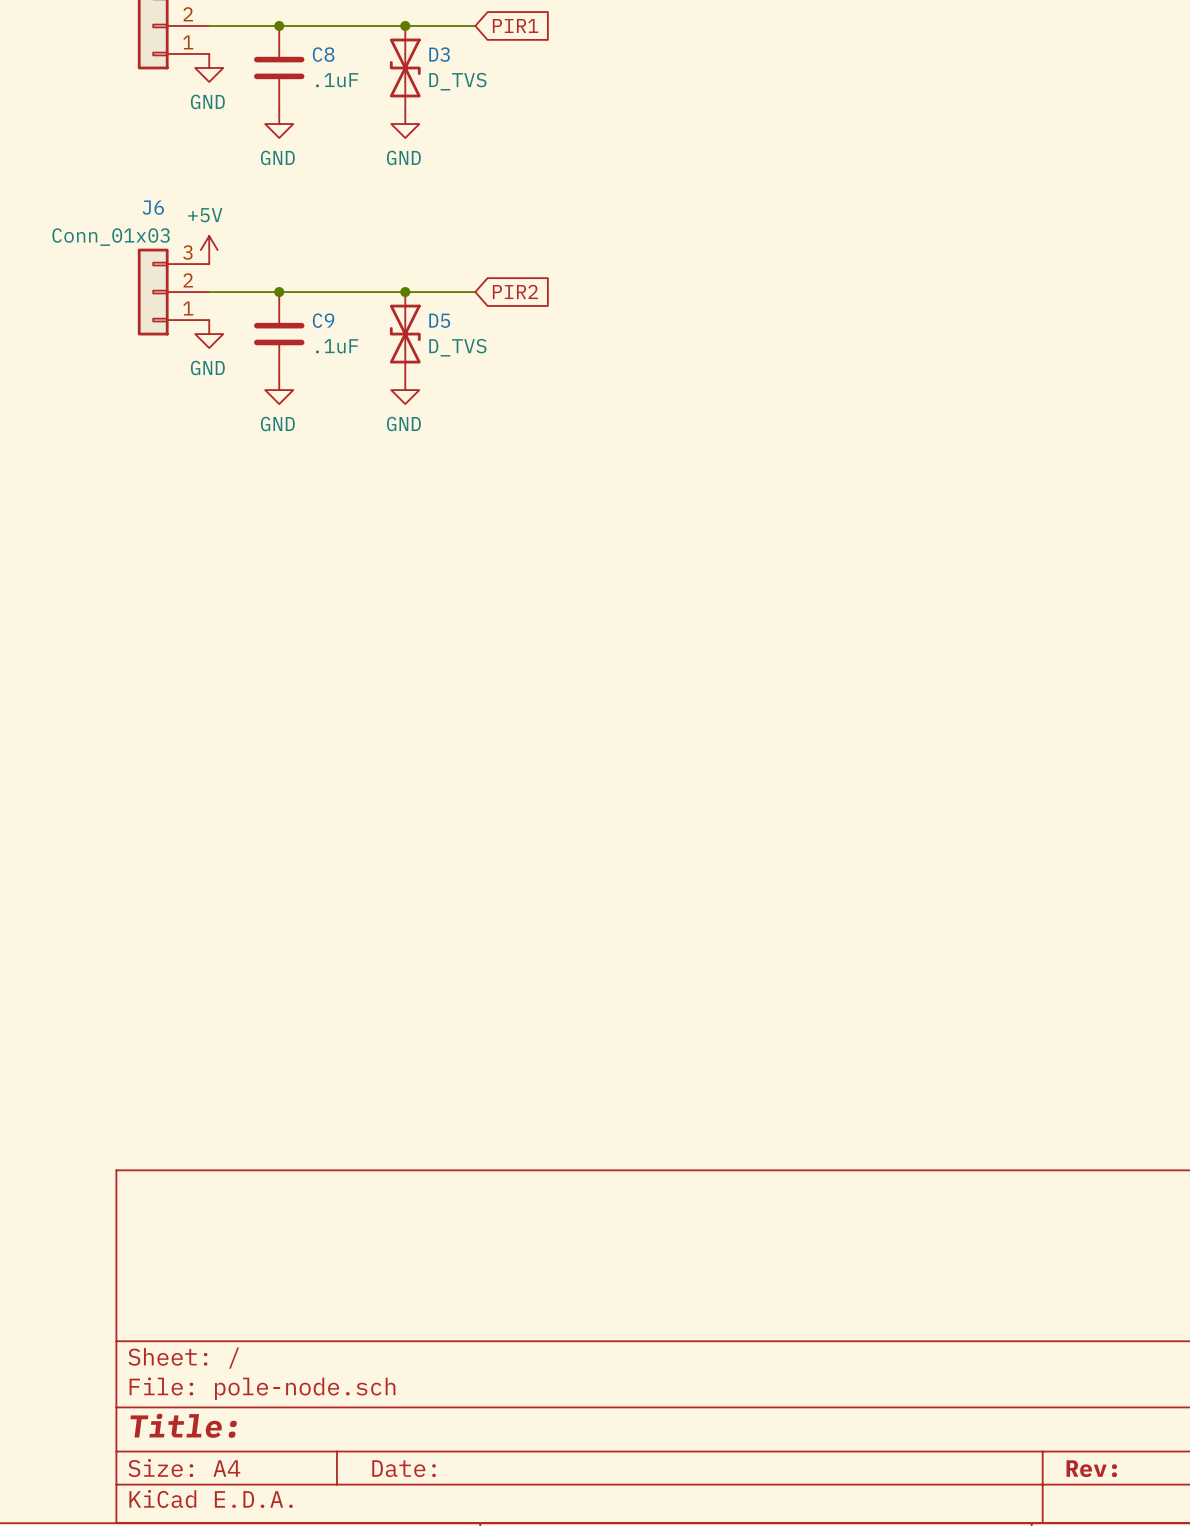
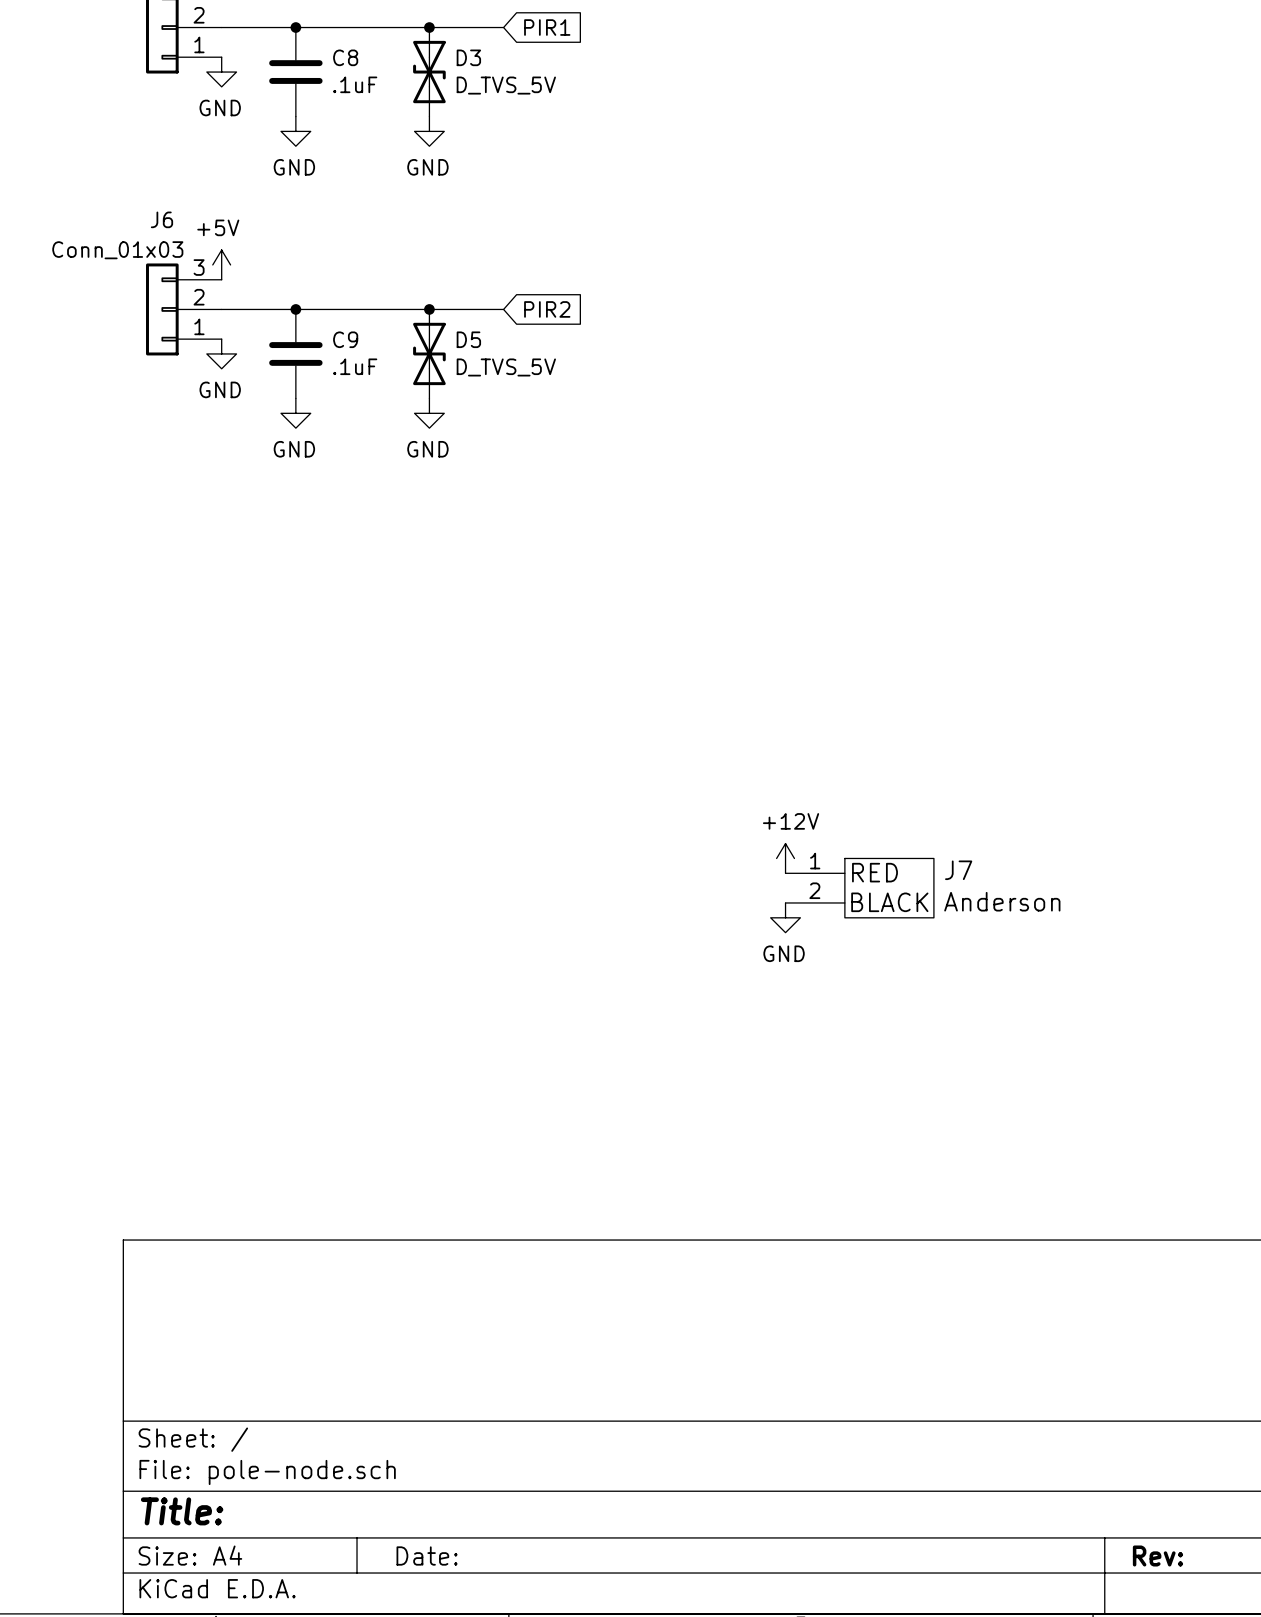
D3 value: D_TVS (457, 81) -> D_TVS_5V (506, 85)
D5 value: D_TVS (457, 347) -> D_TVS_5V (506, 367)
power symbol: none -> +12V (785, 858)
J7: none -> Anderson (859, 888)
power symbol: none -> GND (785, 917)

